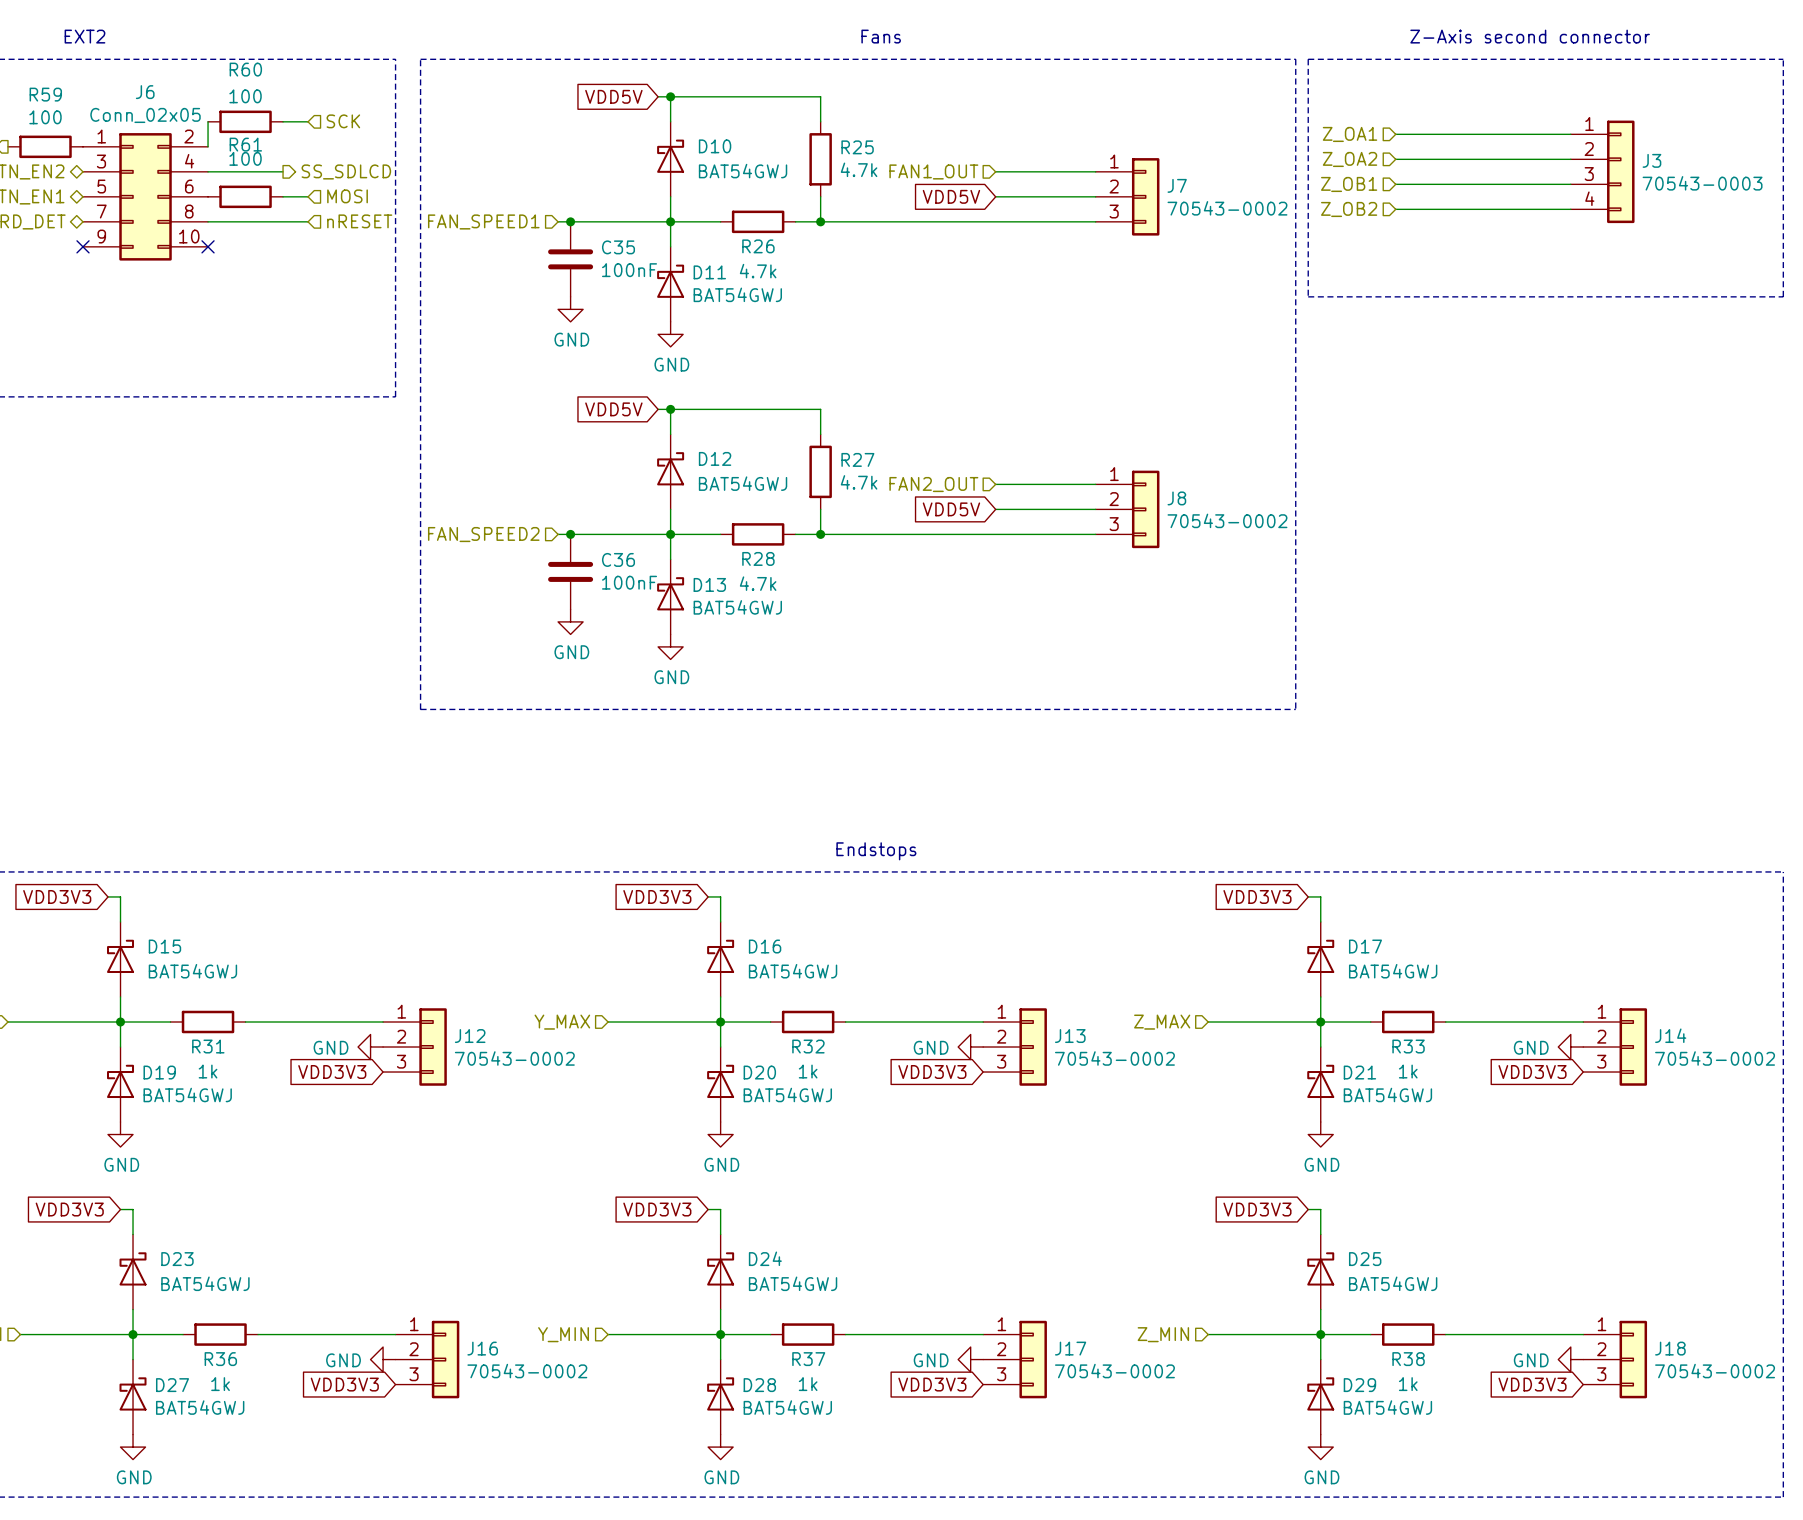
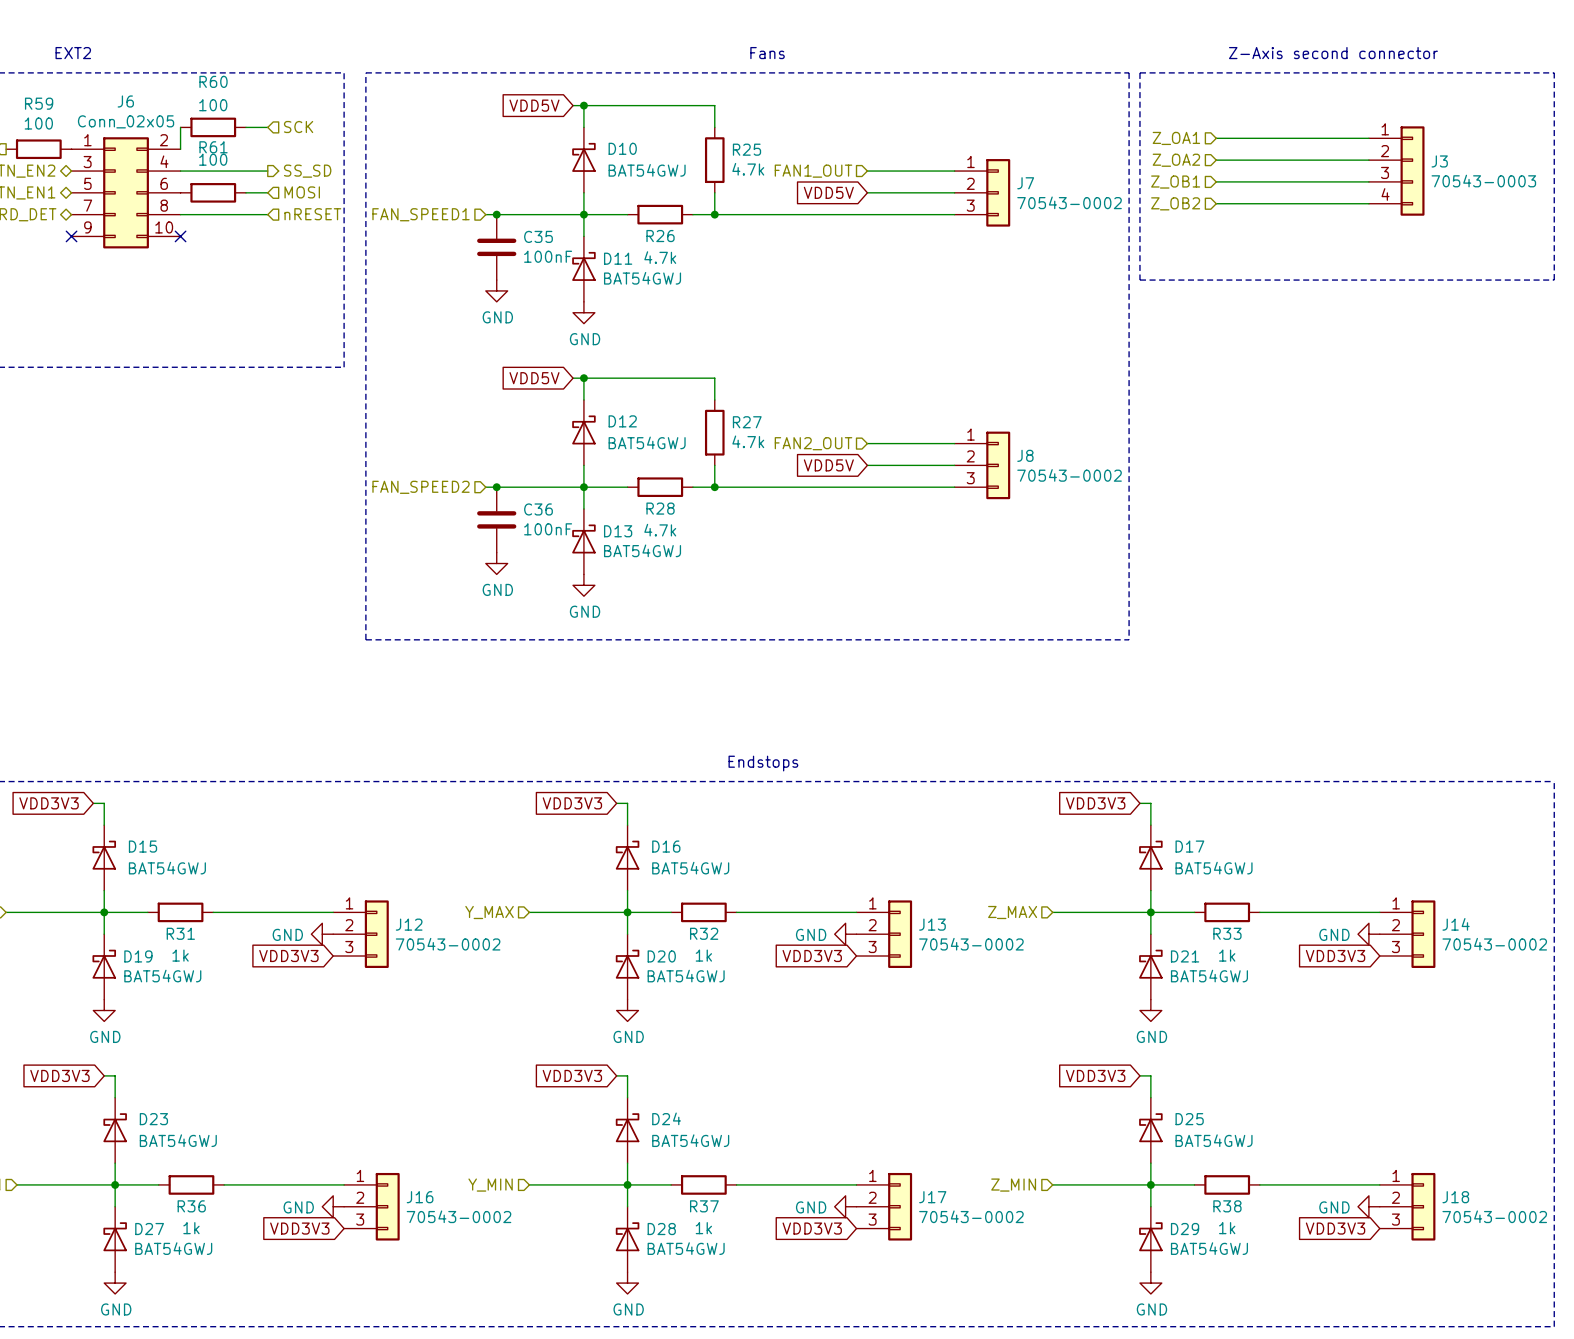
wire: none -> (245, 171) (267, 171)
hierarchical label: SS_SDLCD (346, 171) -> SS_SD (307, 171)

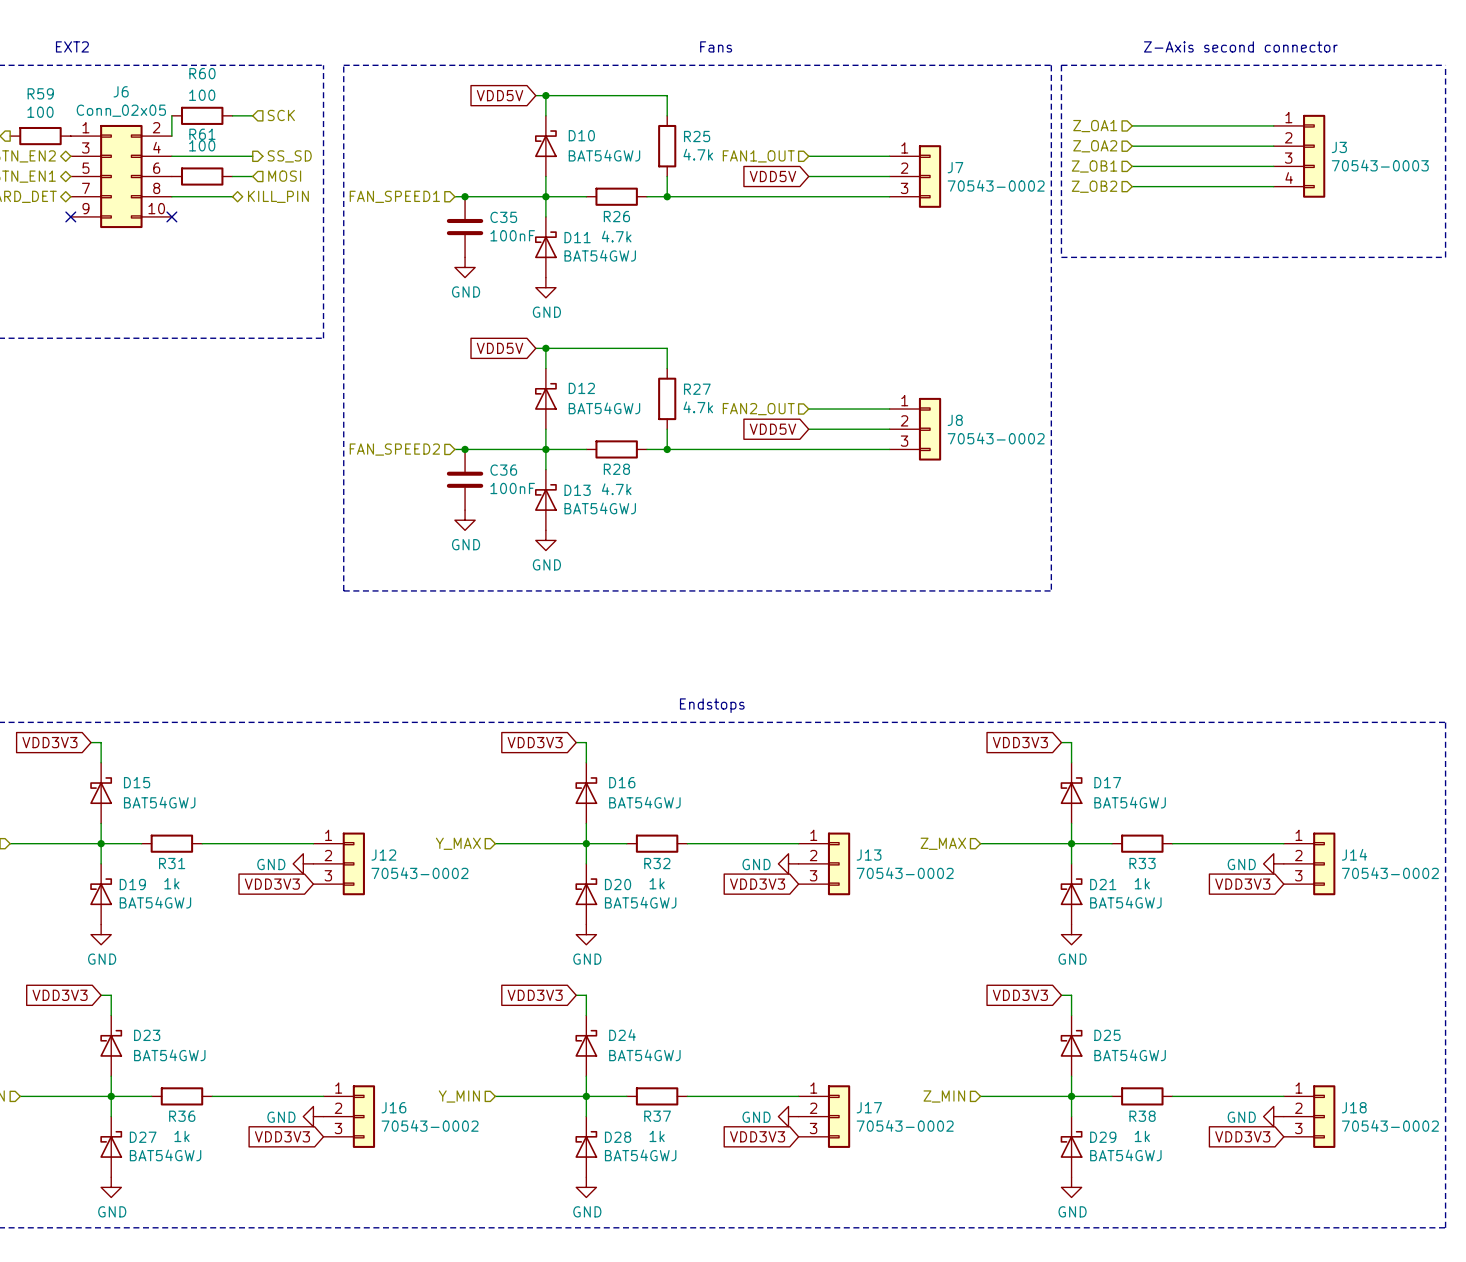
wire: (245, 214) (267, 214) -> none
hierarchical label: none -> KILL_PIN (278, 196)
hierarchical label: nRESET (312, 214) -> none

